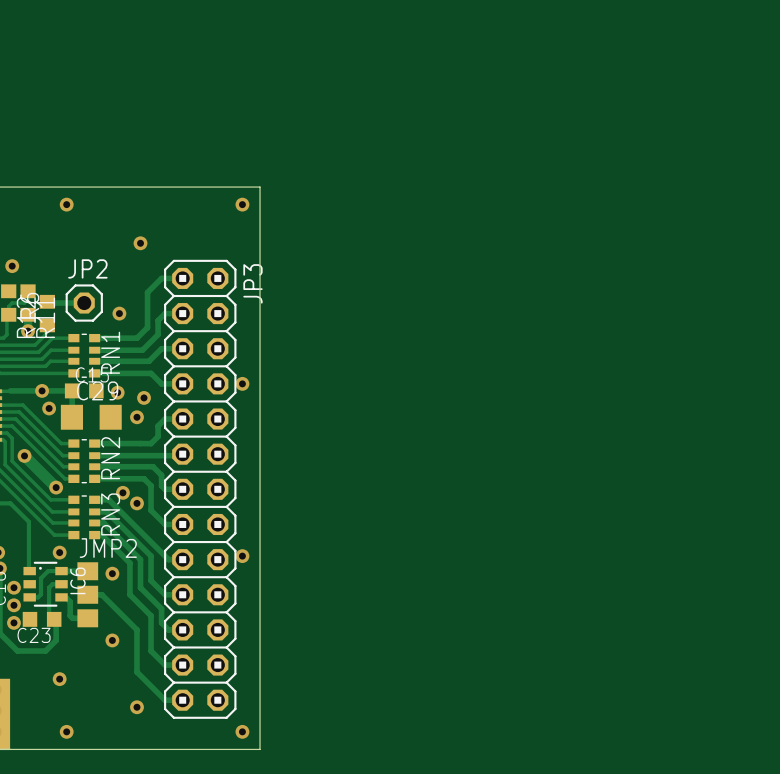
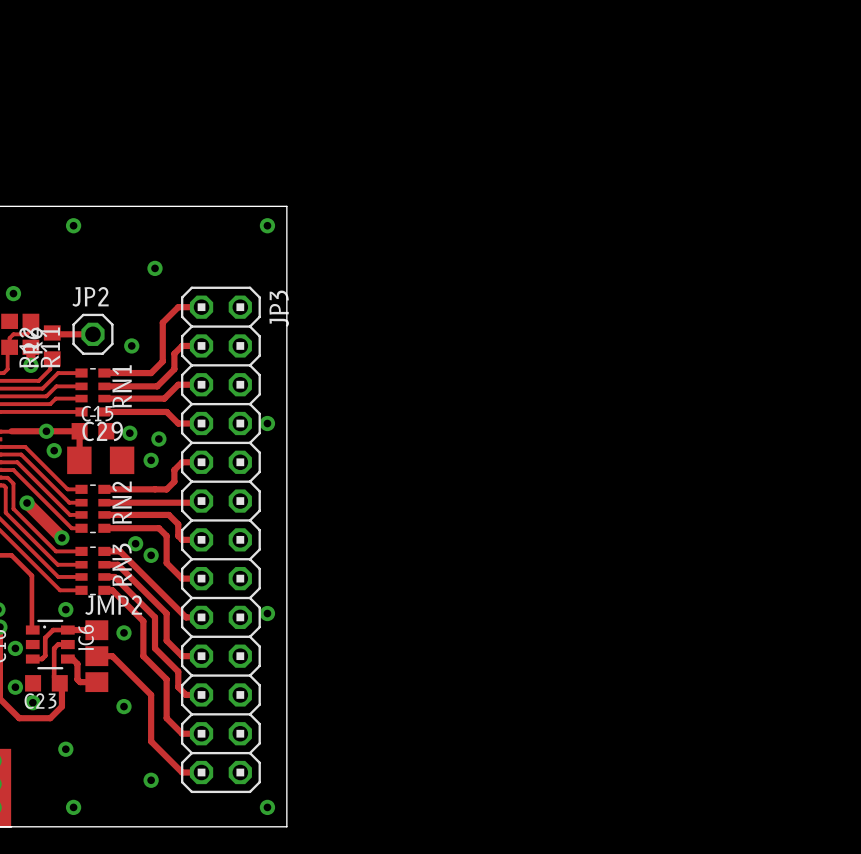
via position: (13, 605) -> (32, 702)

